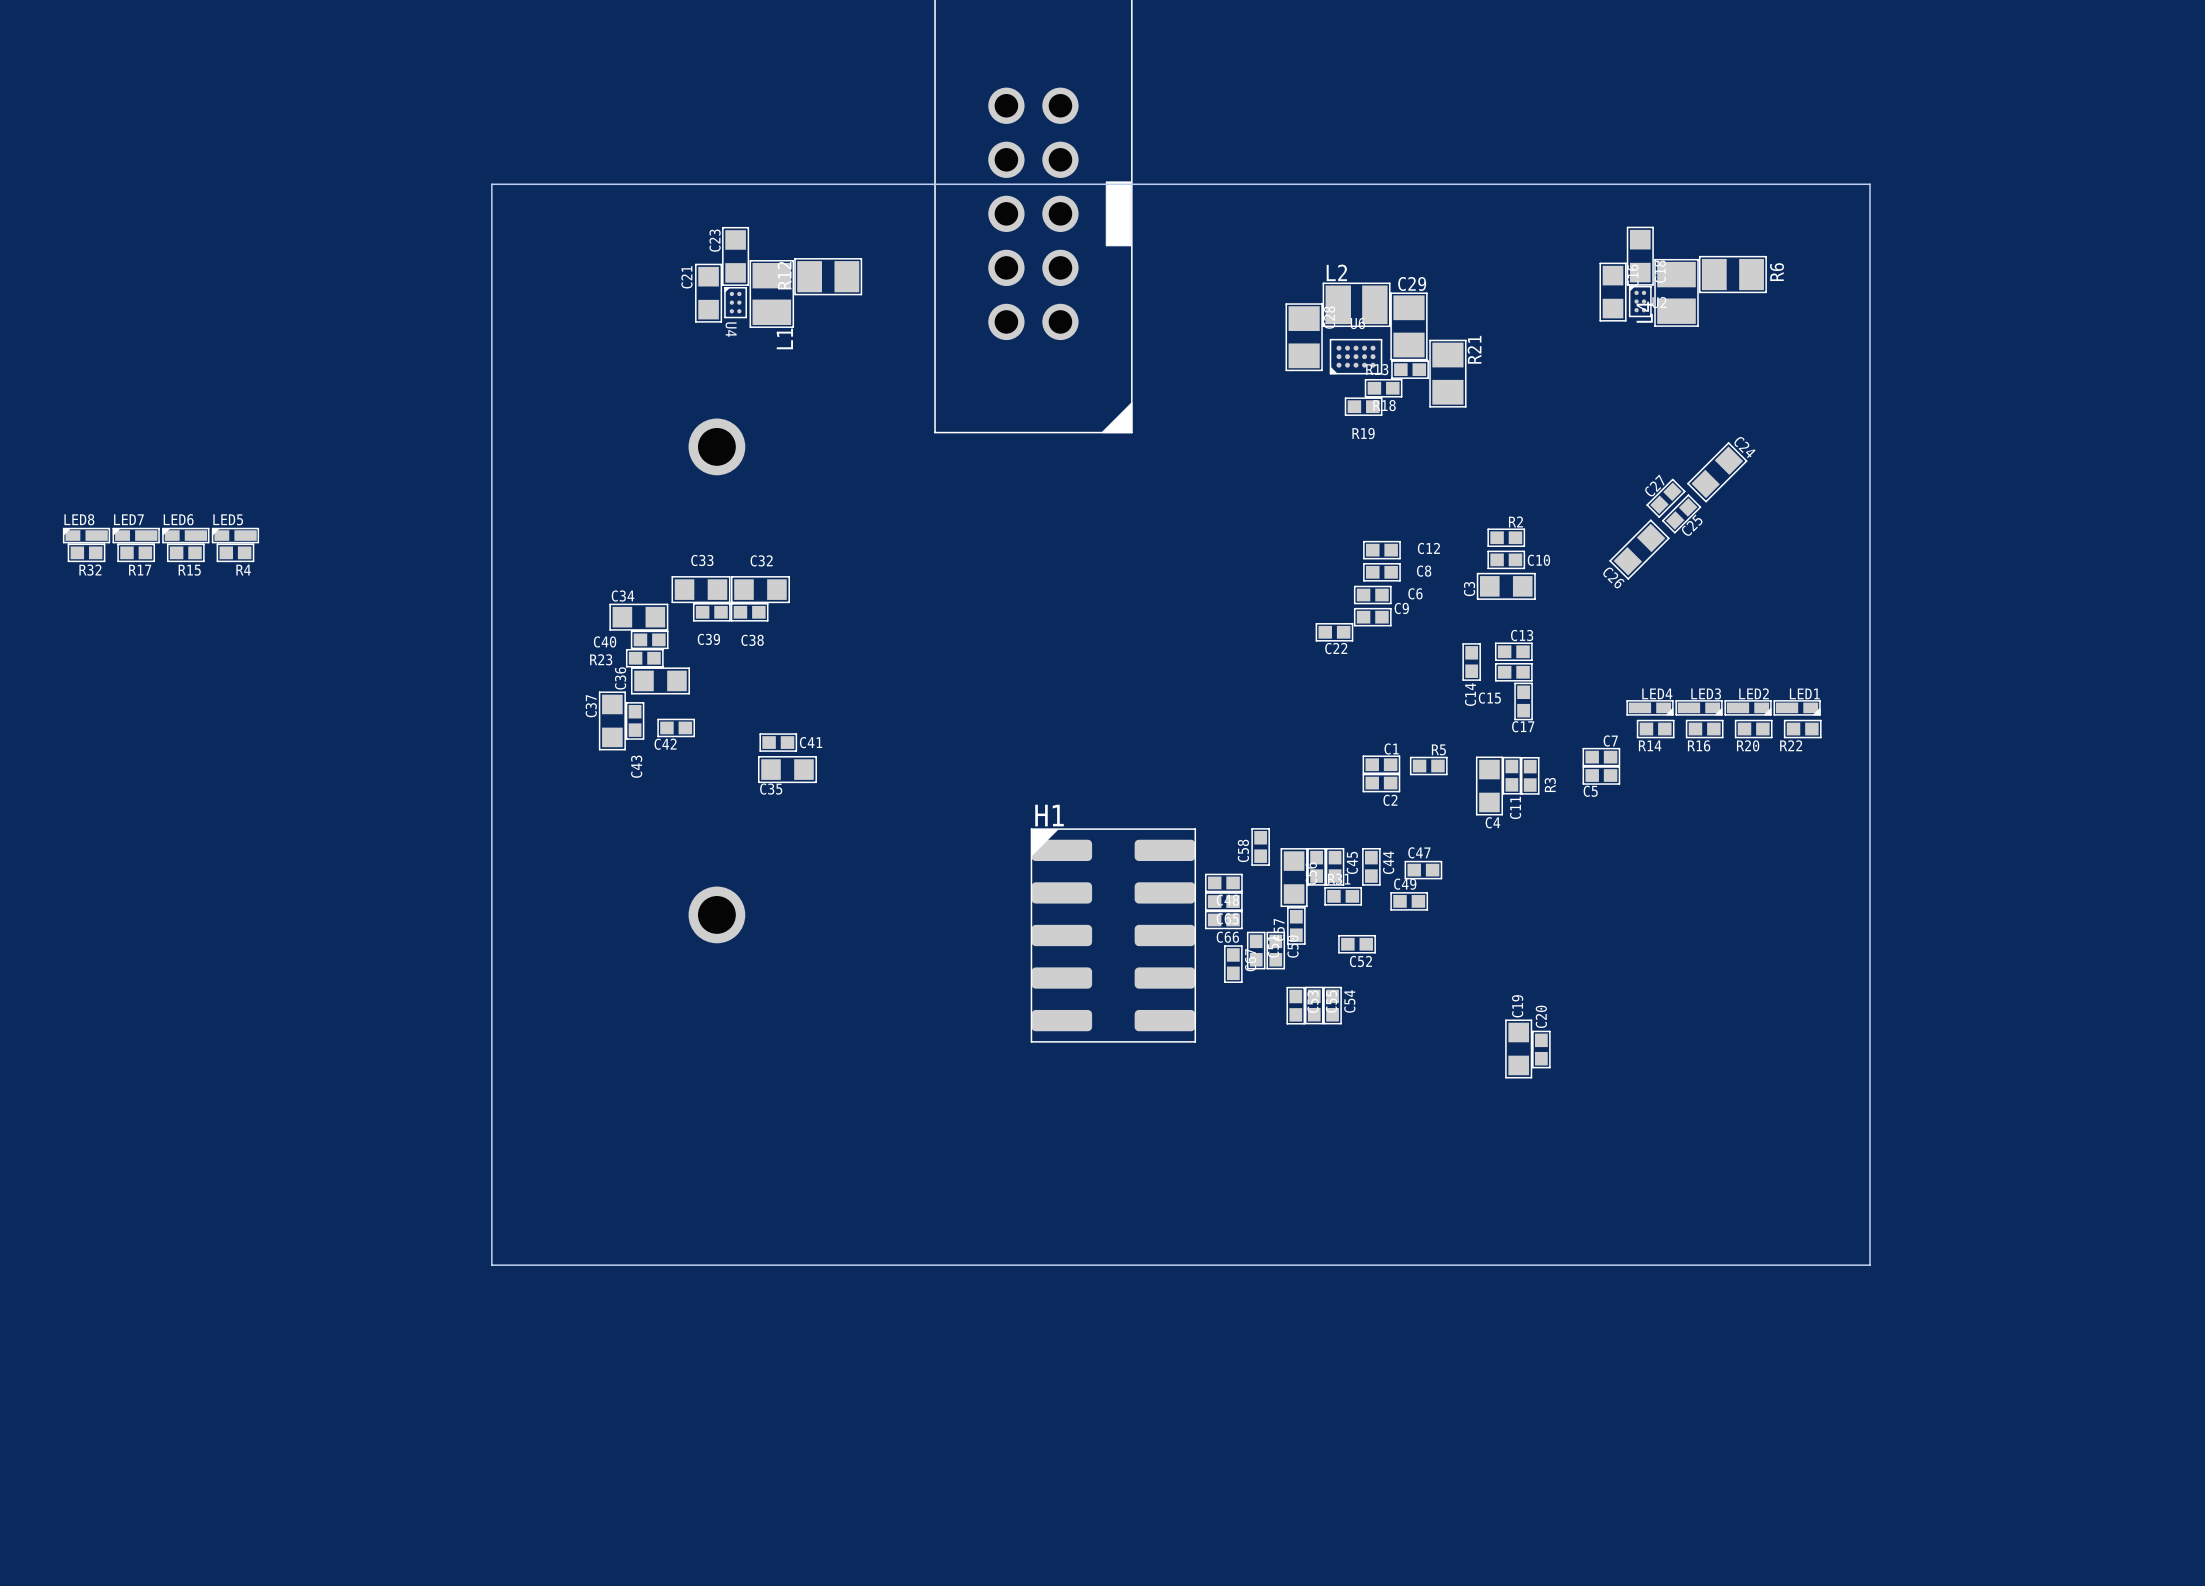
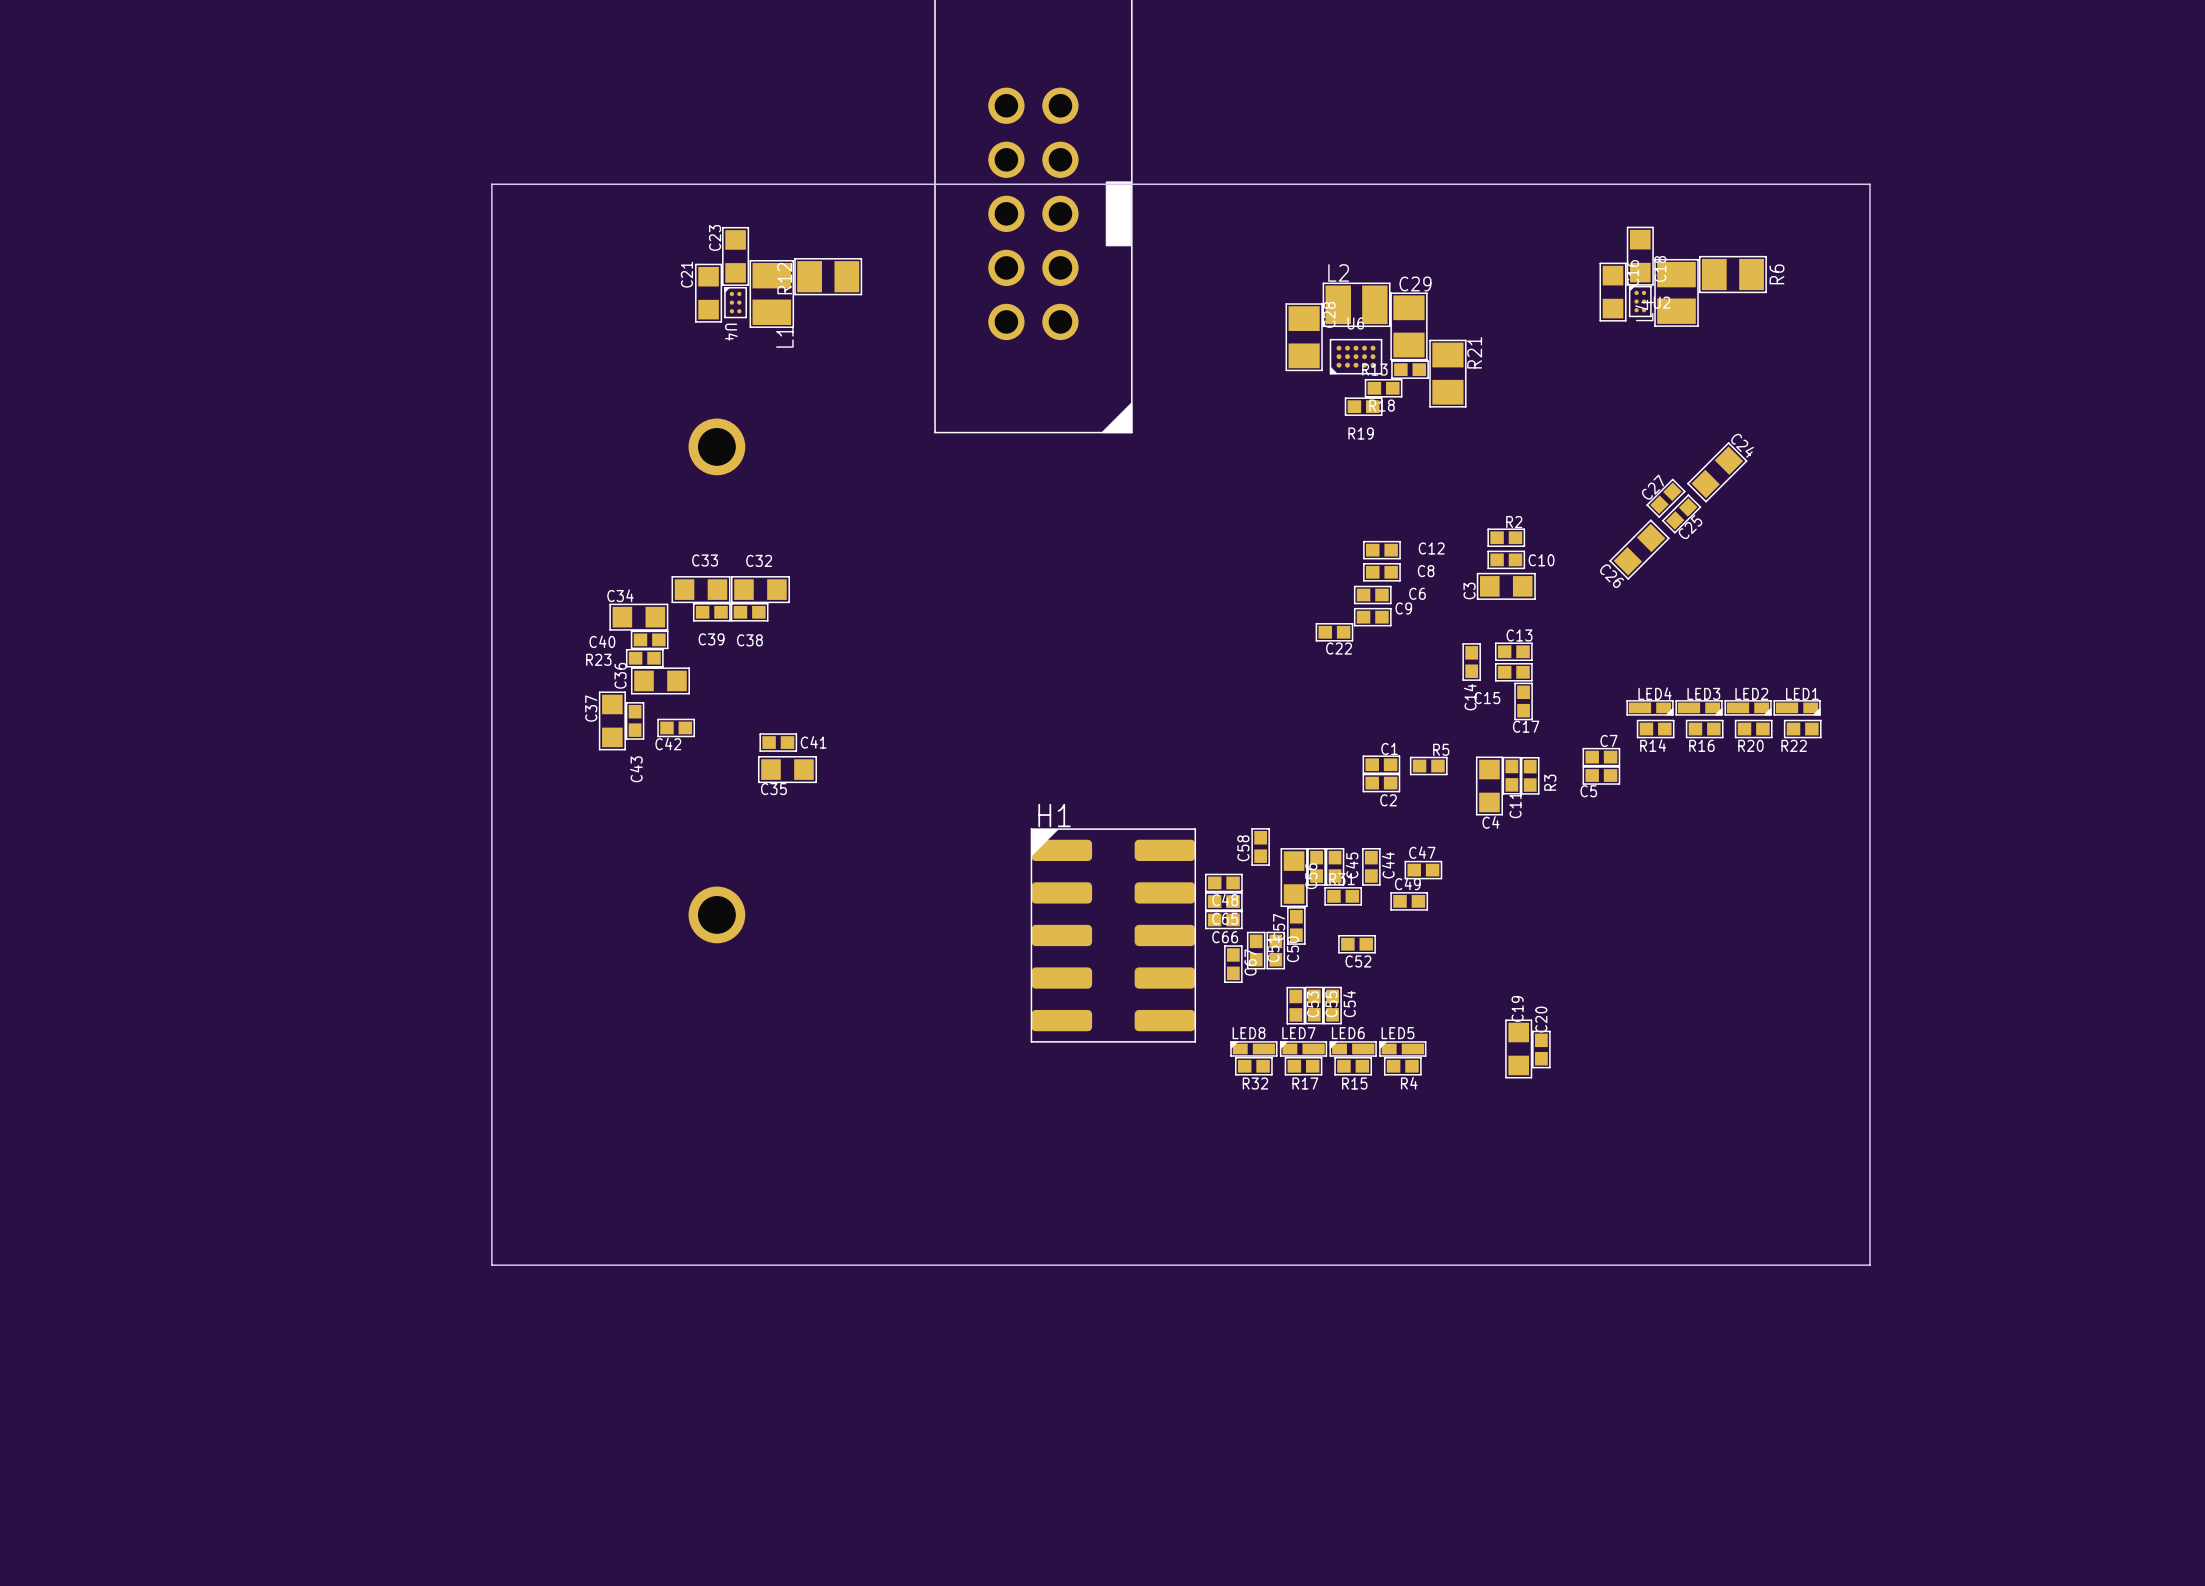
LED8 position: (86, 535) -> (1253, 1048)
LED7 position: (136, 535) -> (1303, 1048)
LED6 position: (185, 535) -> (1353, 1048)
LED5 position: (235, 535) -> (1402, 1048)
R32 position: (86, 552) -> (1253, 1066)
R17 position: (136, 552) -> (1303, 1066)
R15 position: (185, 552) -> (1353, 1066)
R4 position: (235, 552) -> (1402, 1066)

